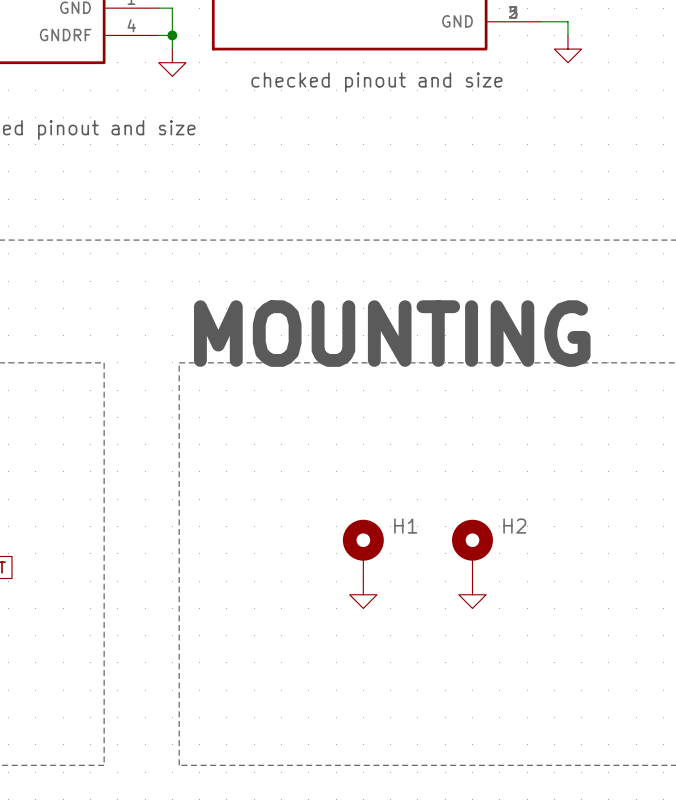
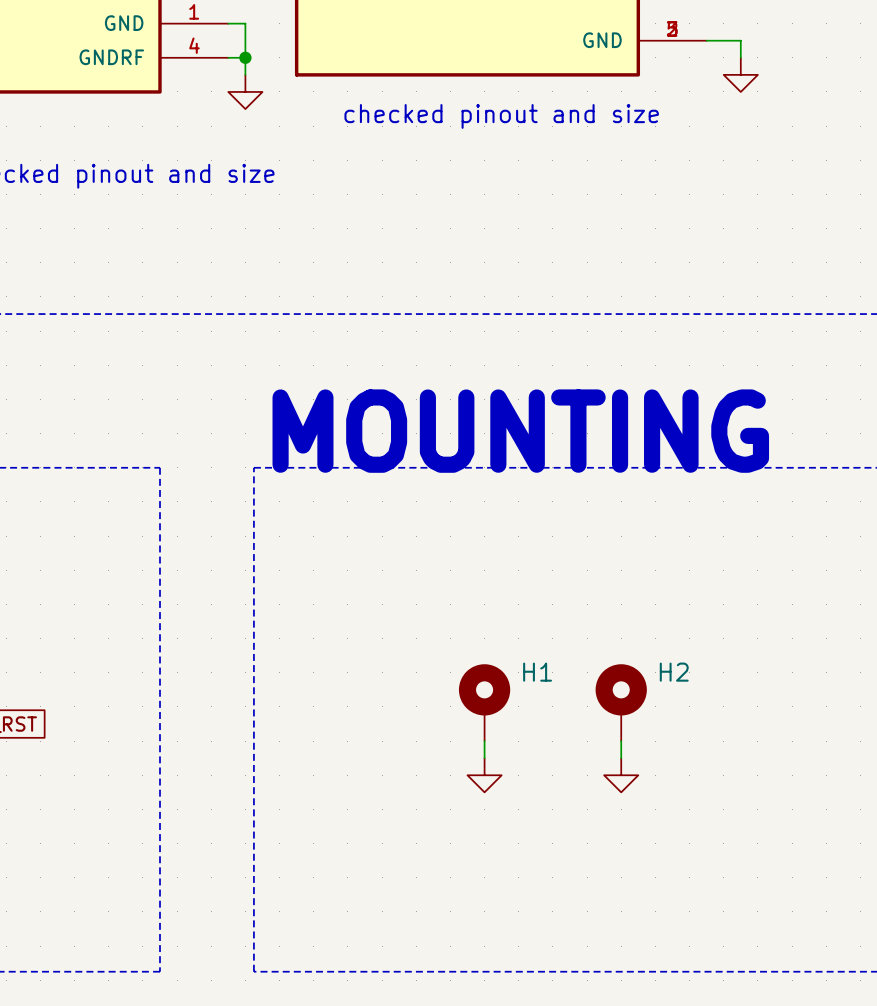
power symbol position: (363, 594) -> (484, 775)
power symbol position: (472, 594) -> (621, 775)

